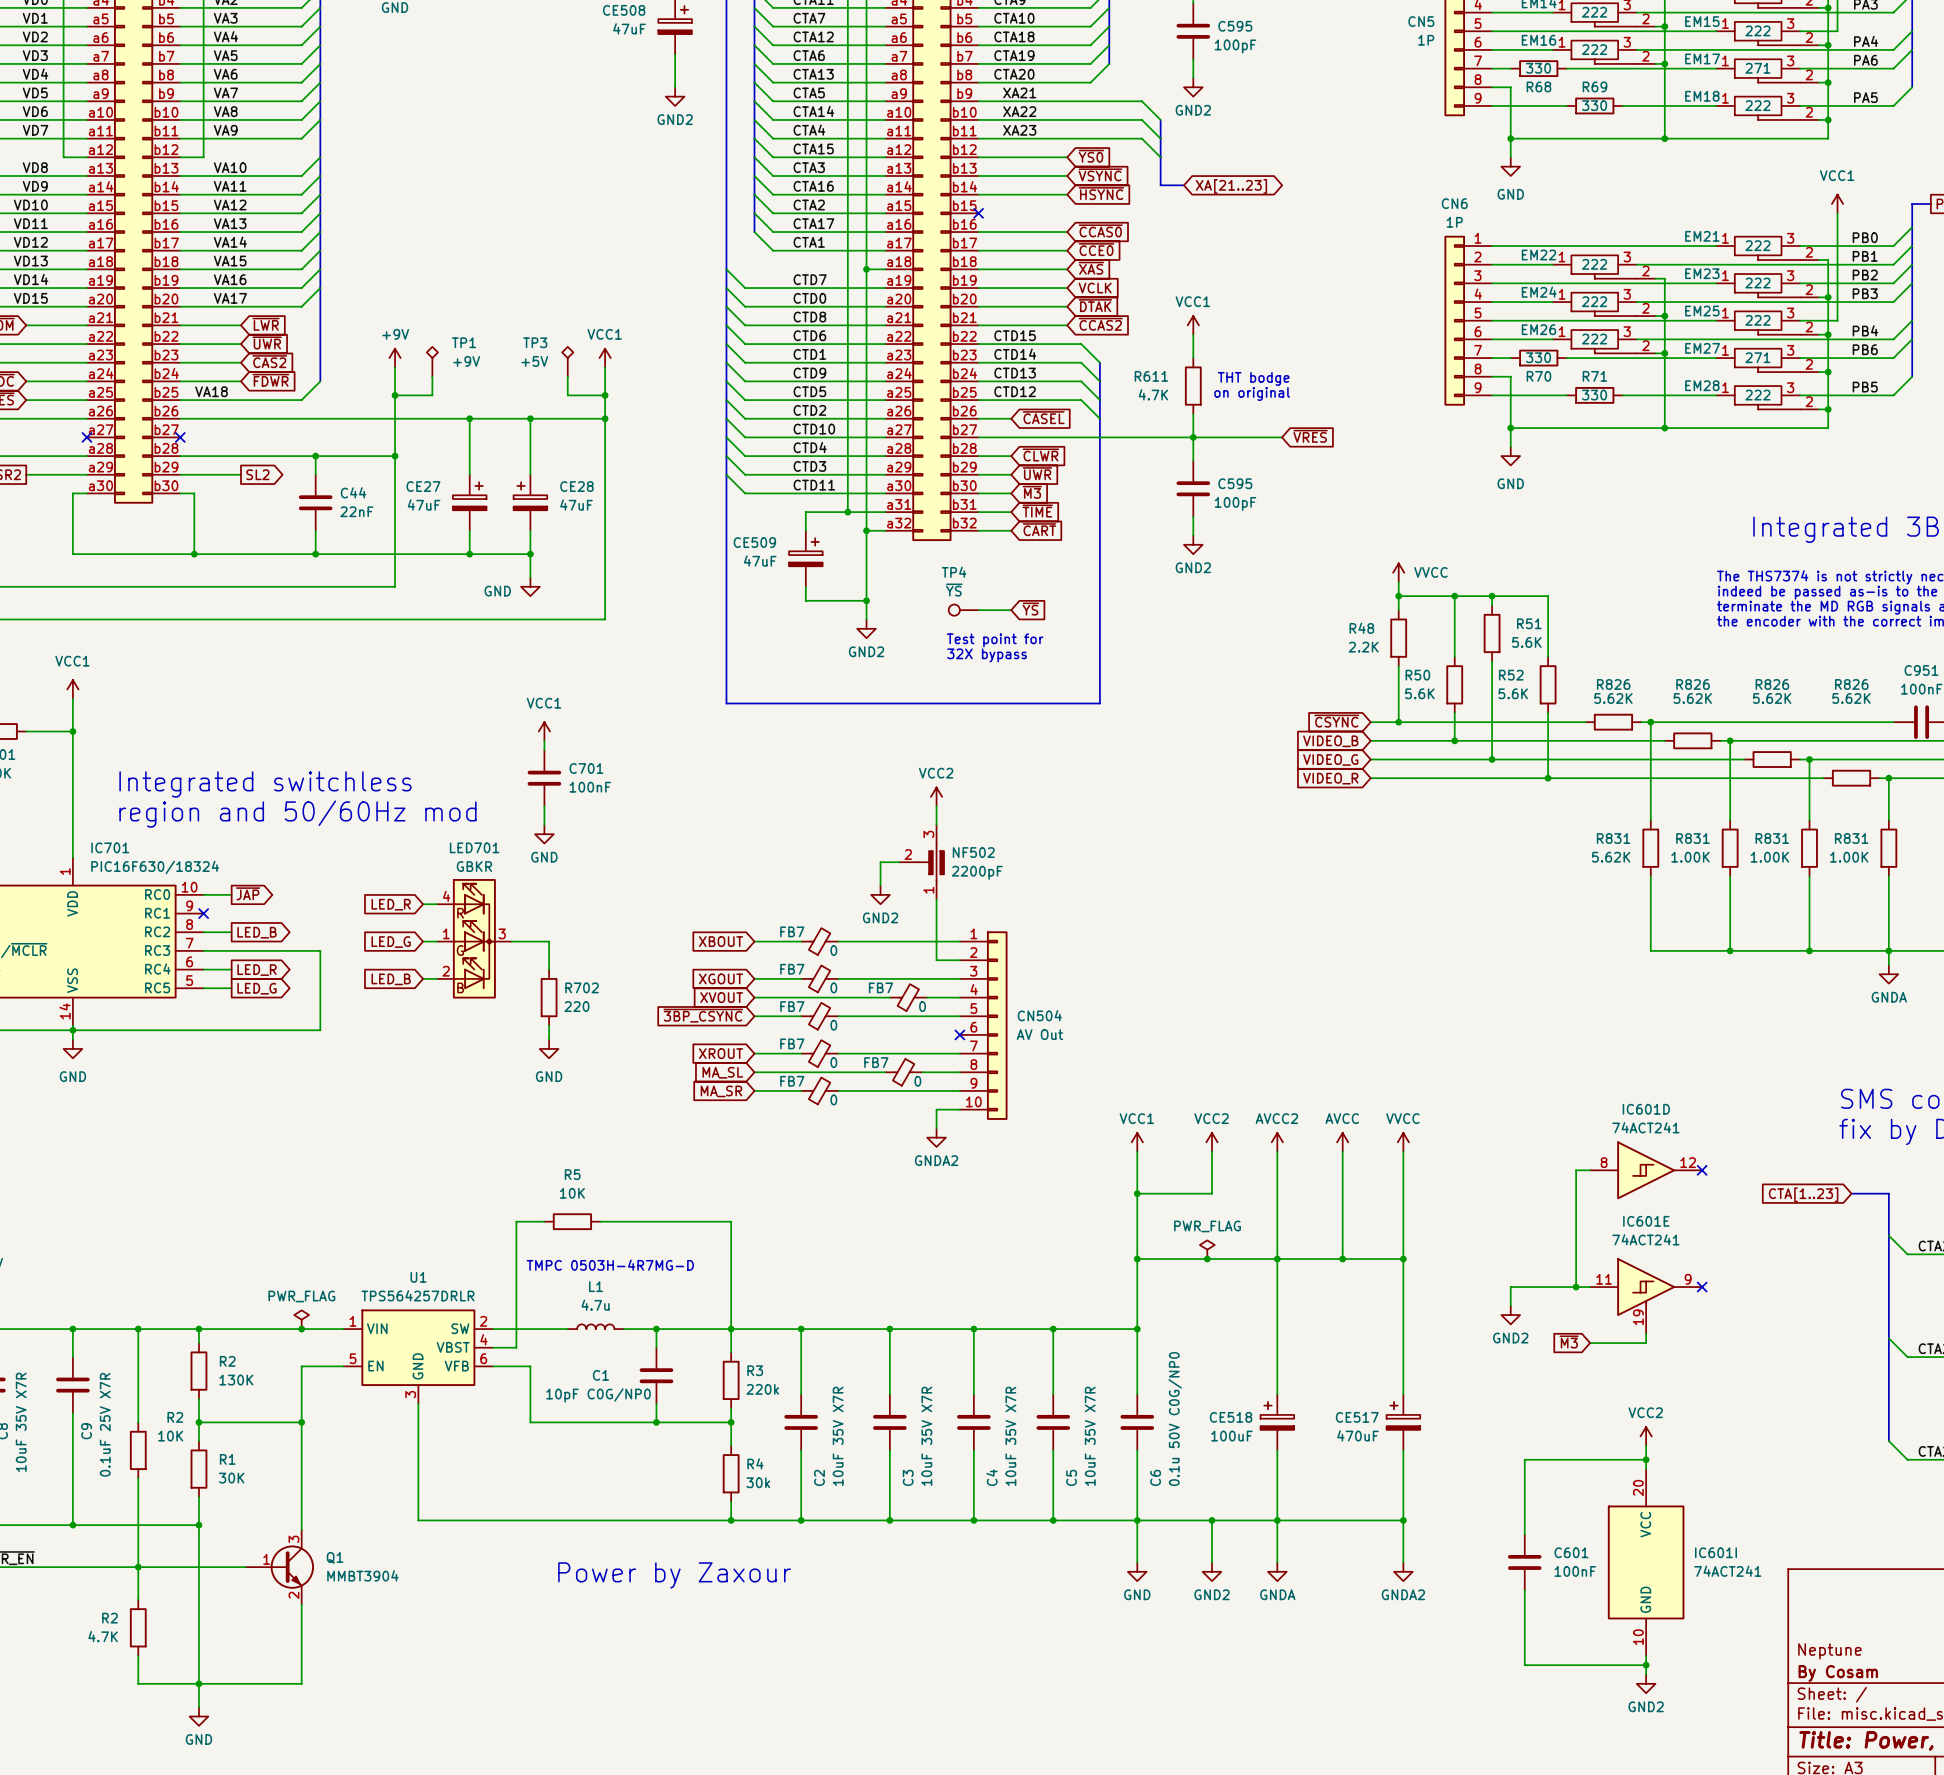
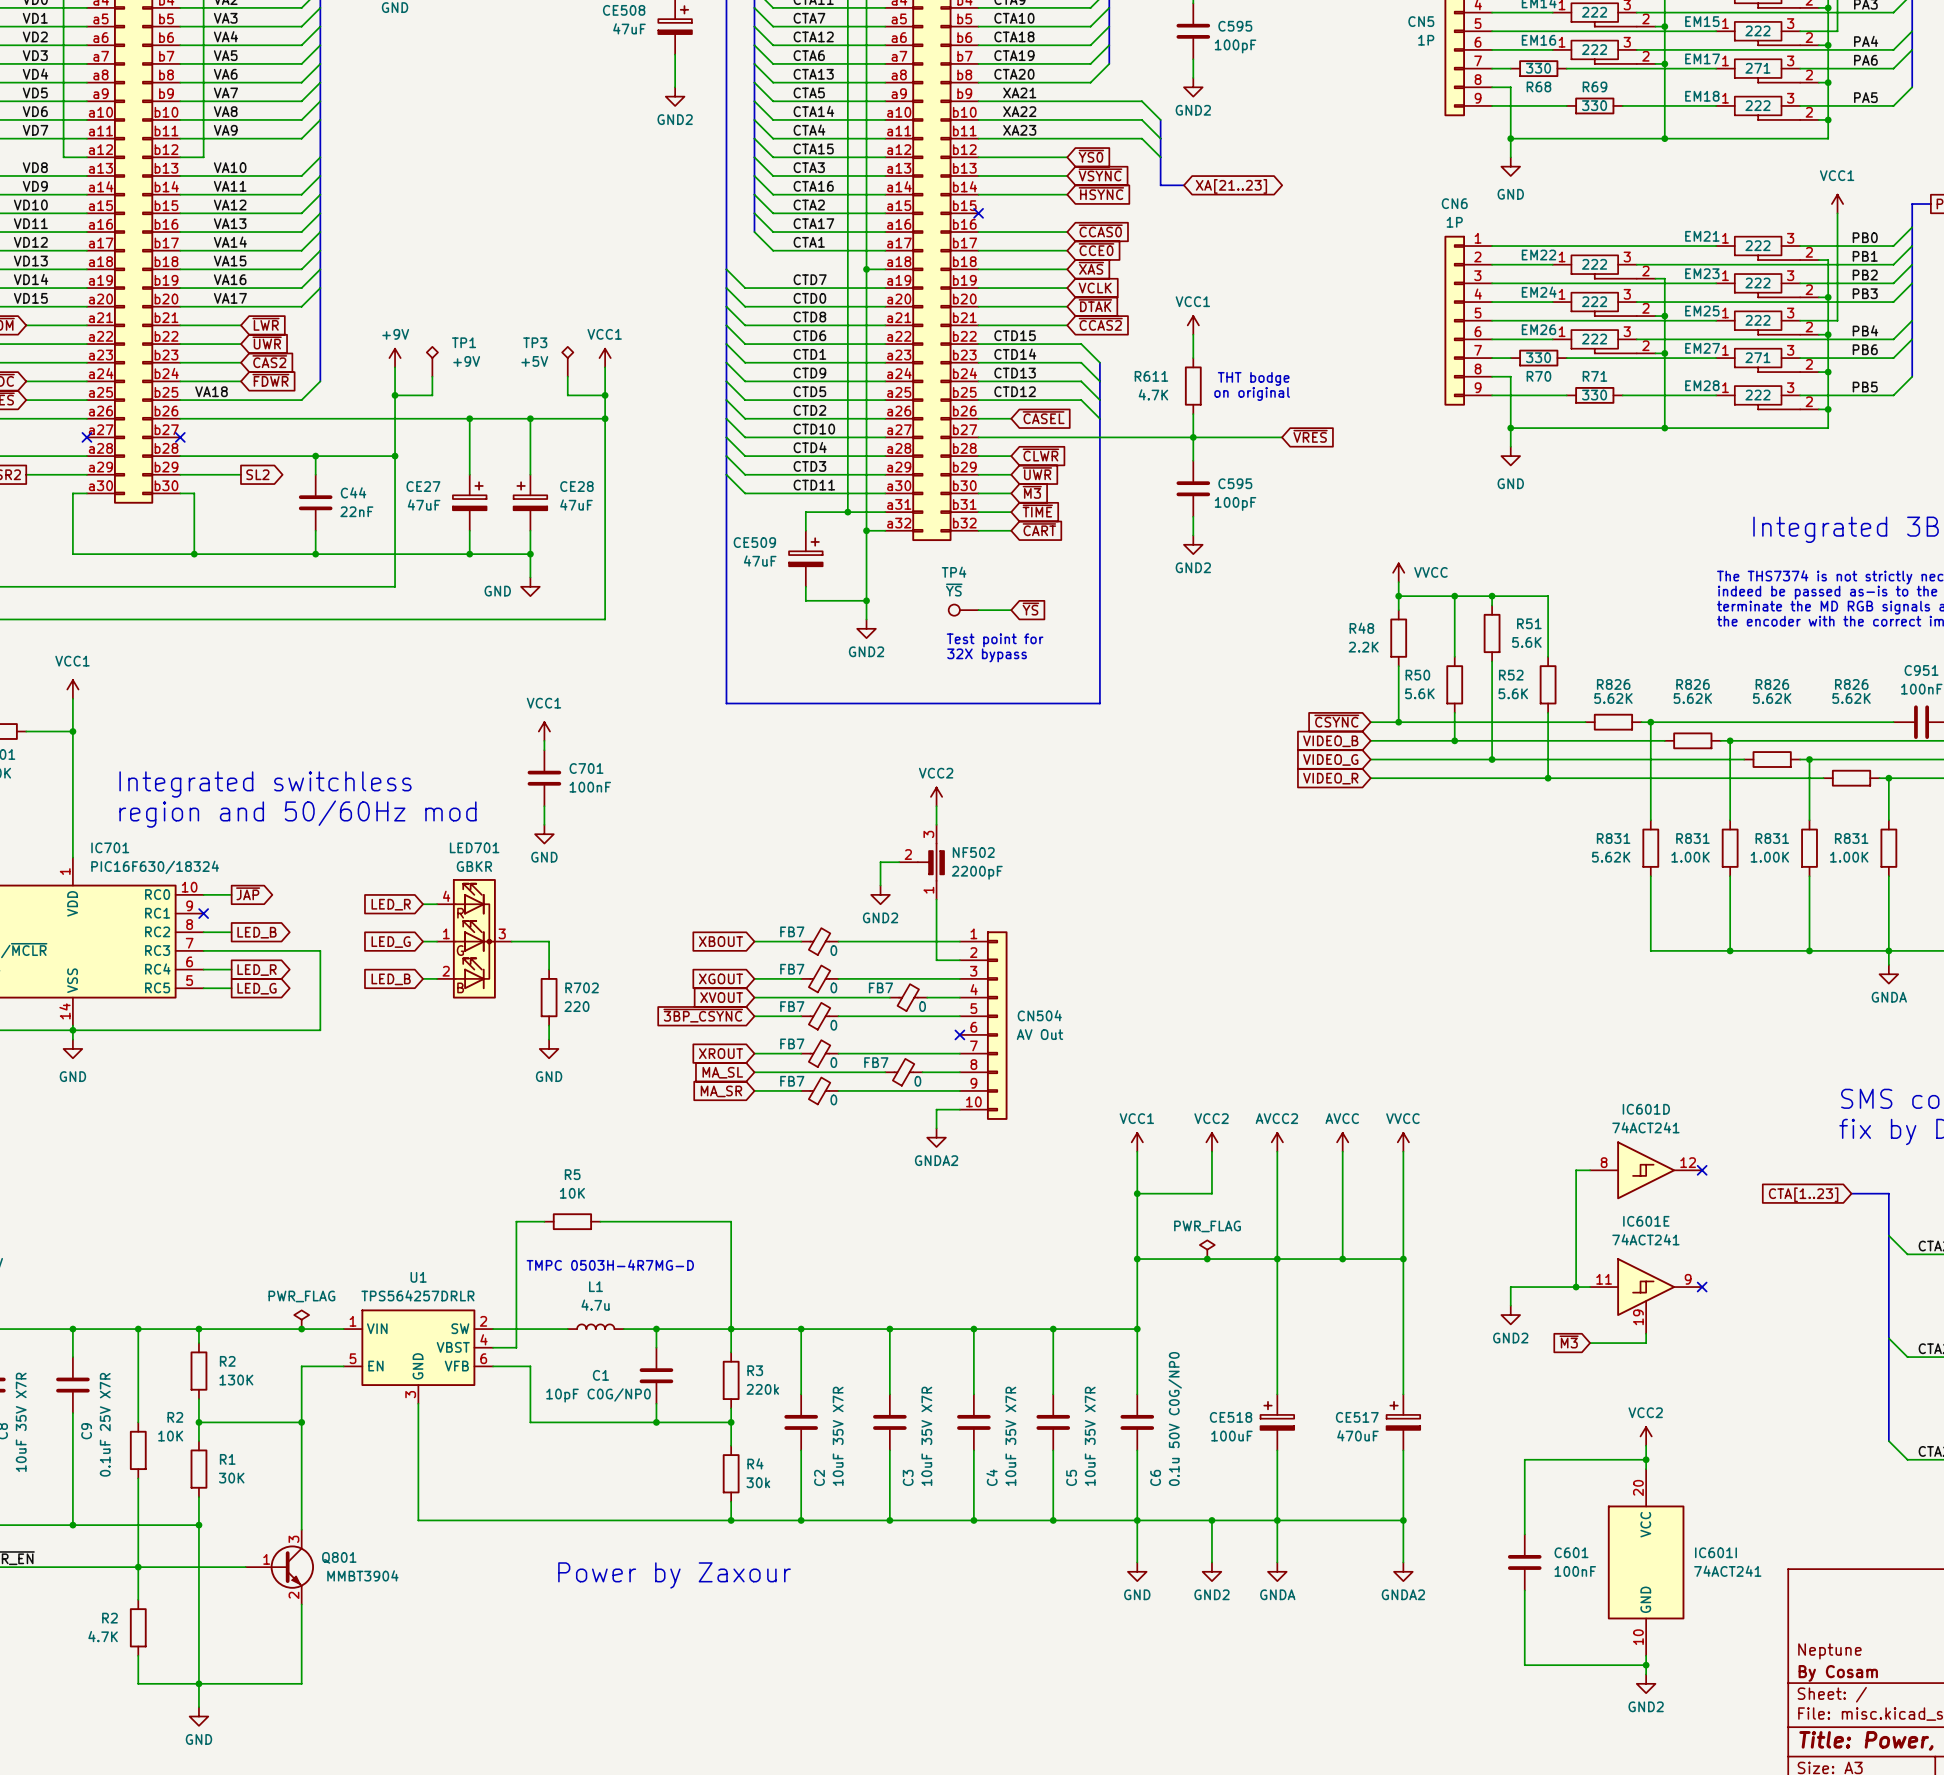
Q1 name: Q1 (335, 1557) -> Q801 (339, 1557)

